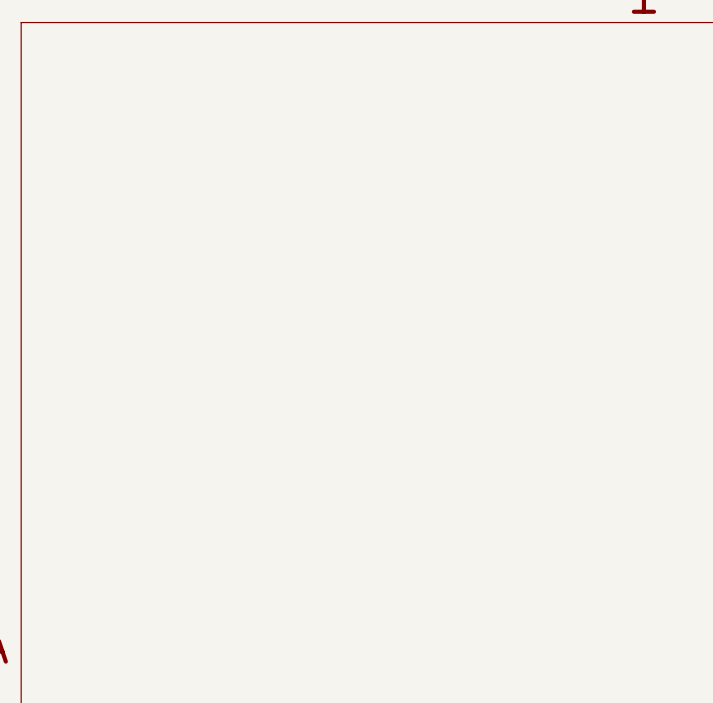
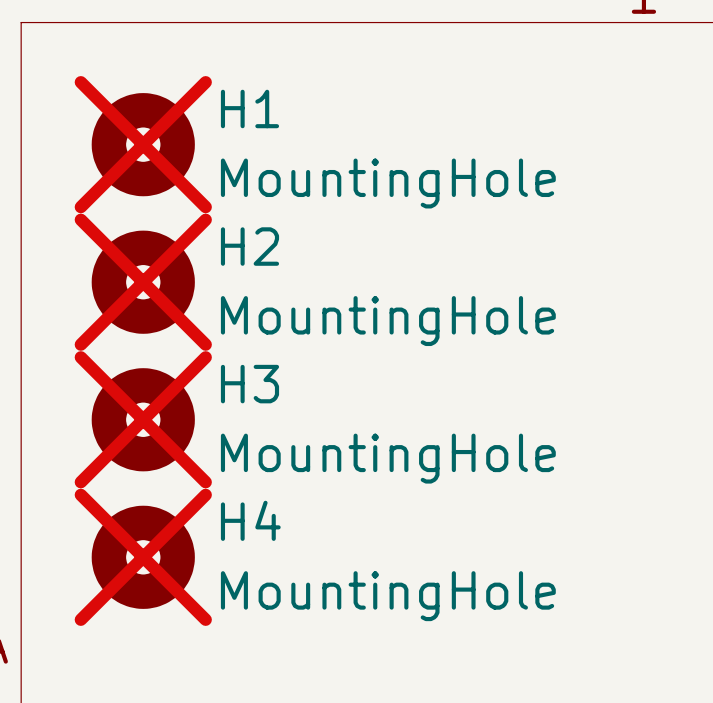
H1: none -> MountingHole (143, 144)
H2: none -> MountingHole (143, 282)
H3: none -> MountingHole (143, 419)
H4: none -> MountingHole (143, 557)

